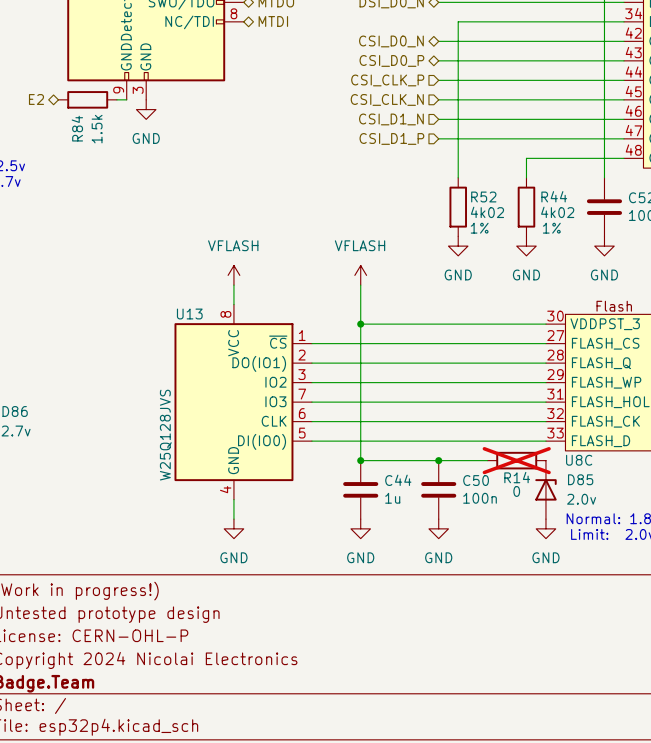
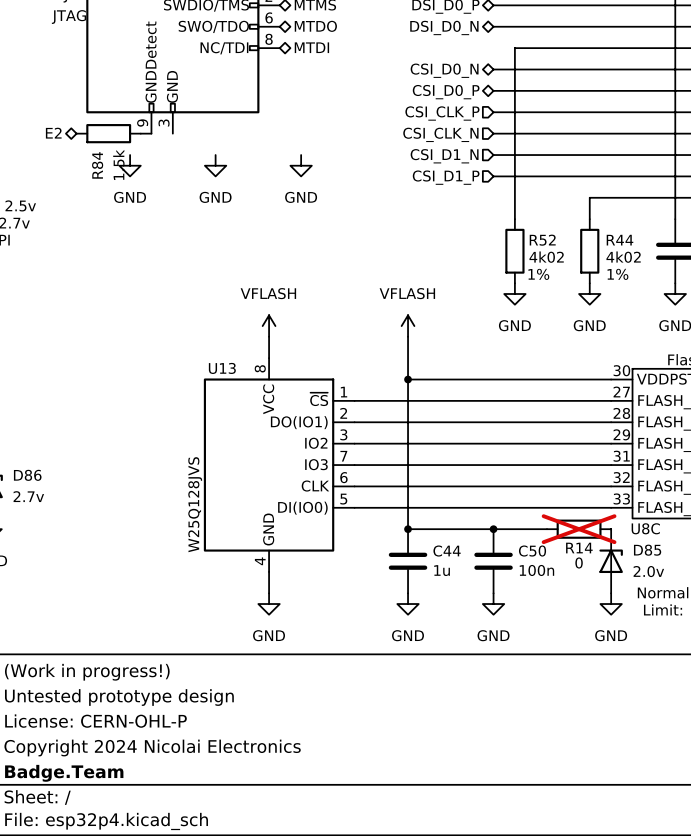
power symbol: GND (146, 109) -> none
power symbol: none -> GND (130, 165)
power symbol: none -> GND (215, 165)
power symbol: none -> GND (301, 165)

